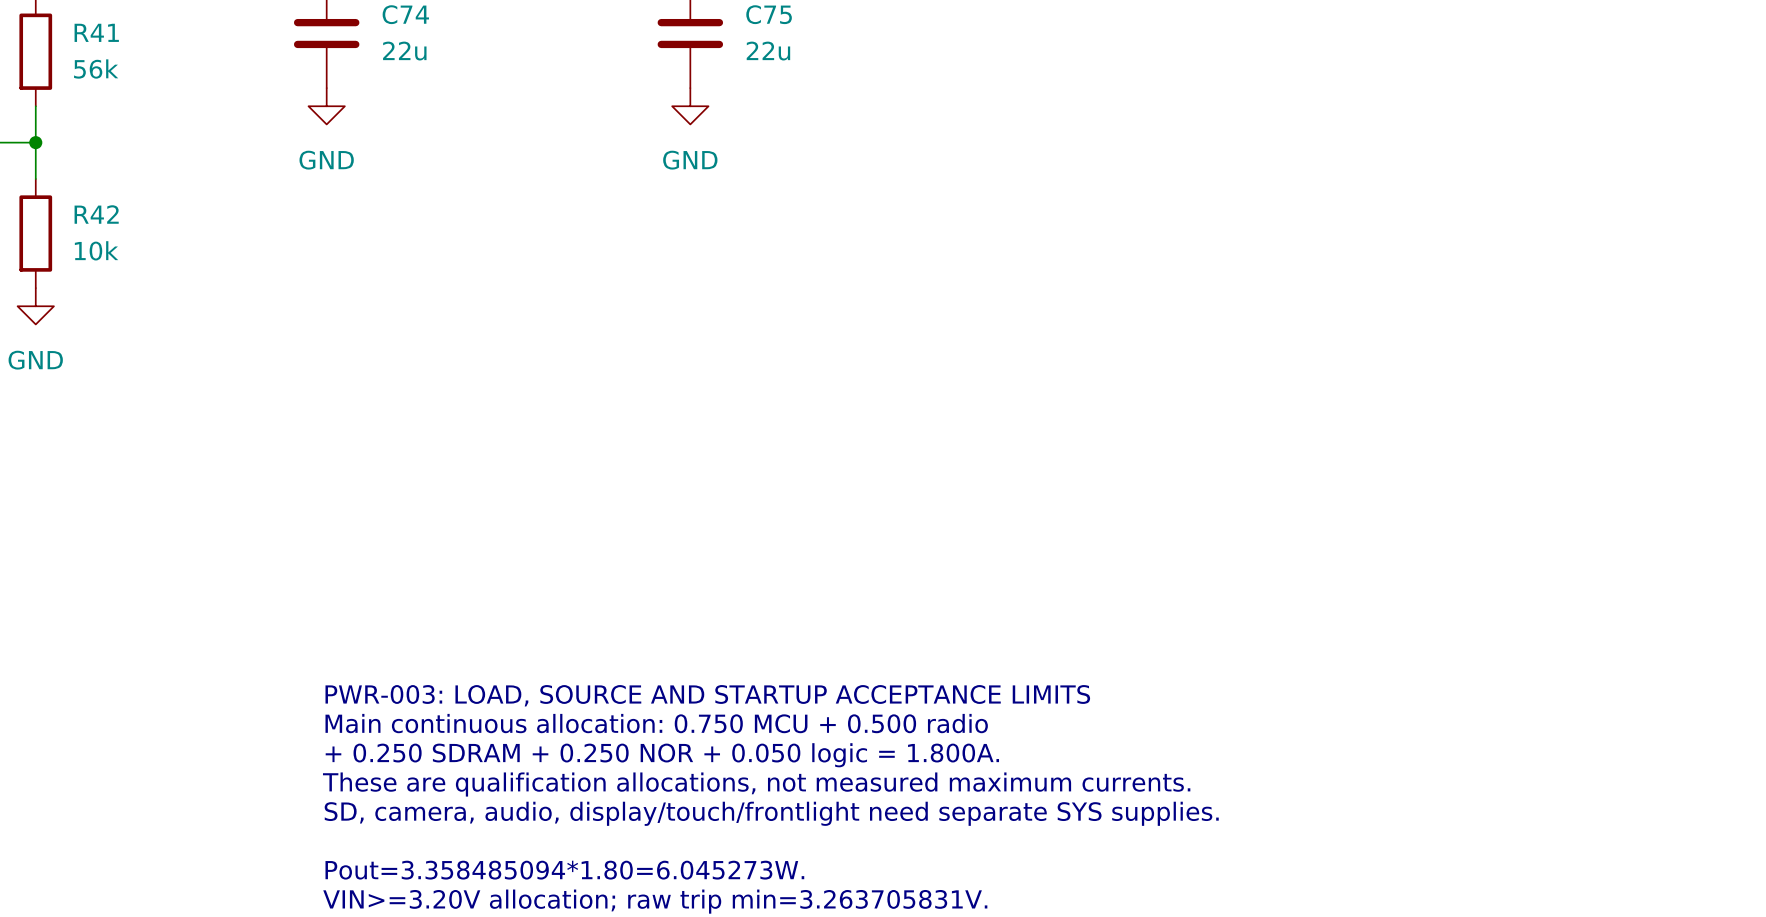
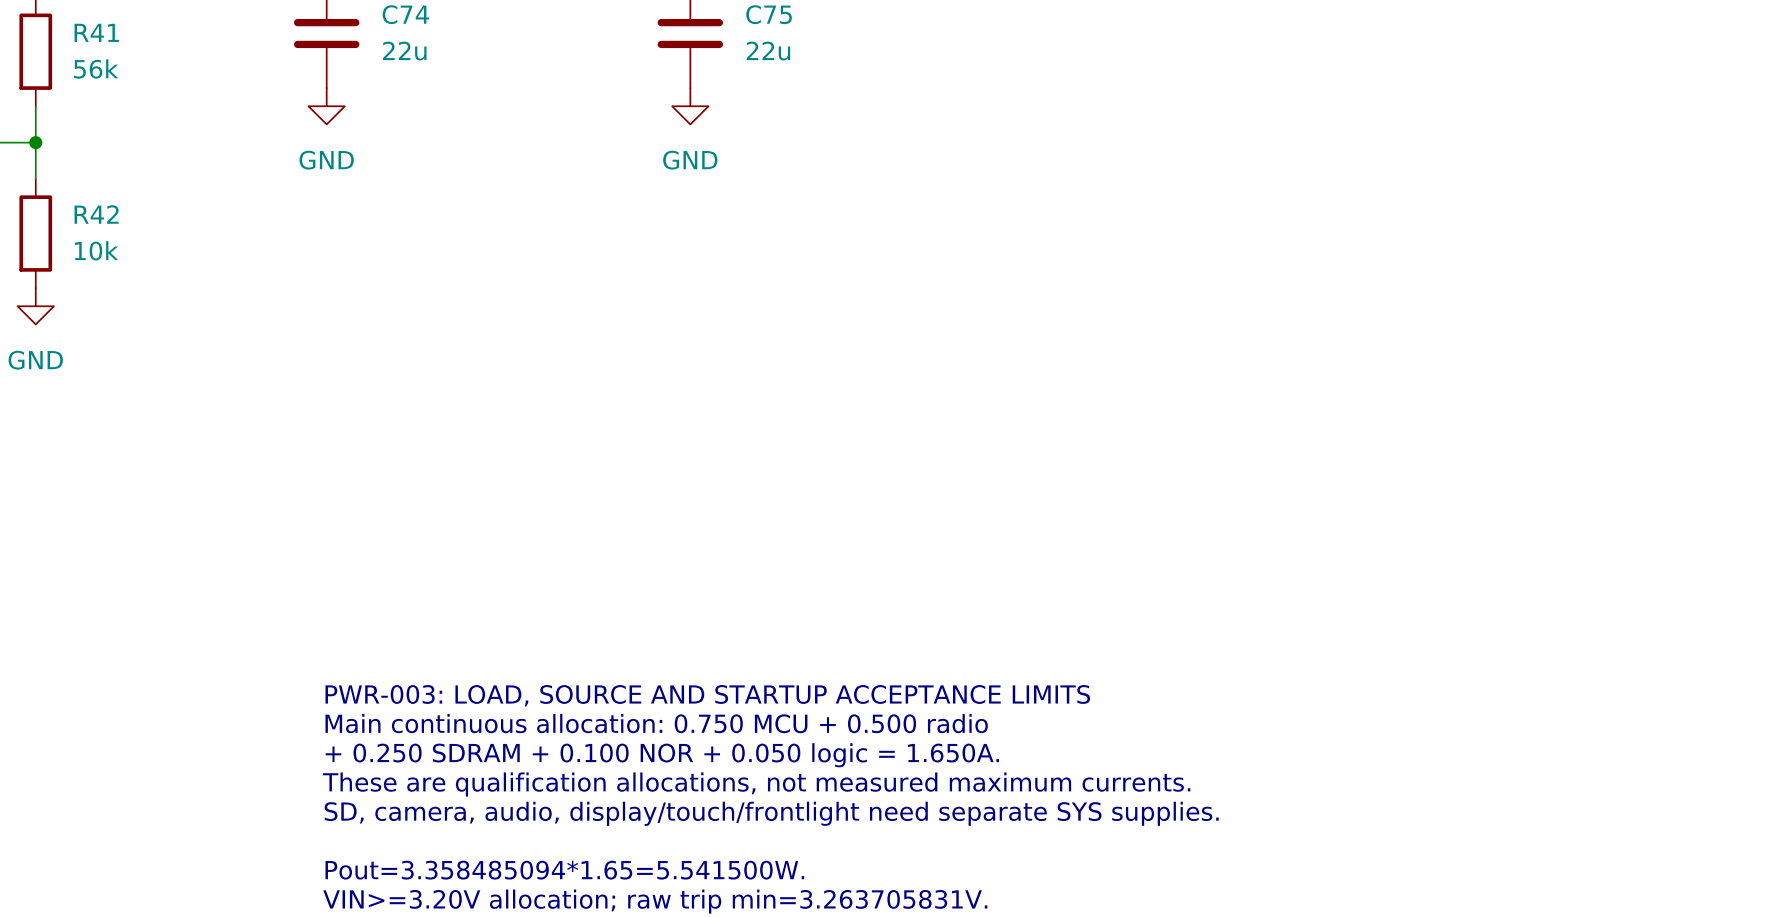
text: + 0.250 SDRAM + 0.250 NOR + 0.050 logic = 1.800A. (662, 755) -> + 0.250 SDRAM + 0.100 NOR + 0.050 logic = 1.650A. (662, 755)
text: Pout=3.358485094*1.80=6.045273W. (564, 870) -> Pout=3.358485094*1.65=5.541500W. (564, 870)

